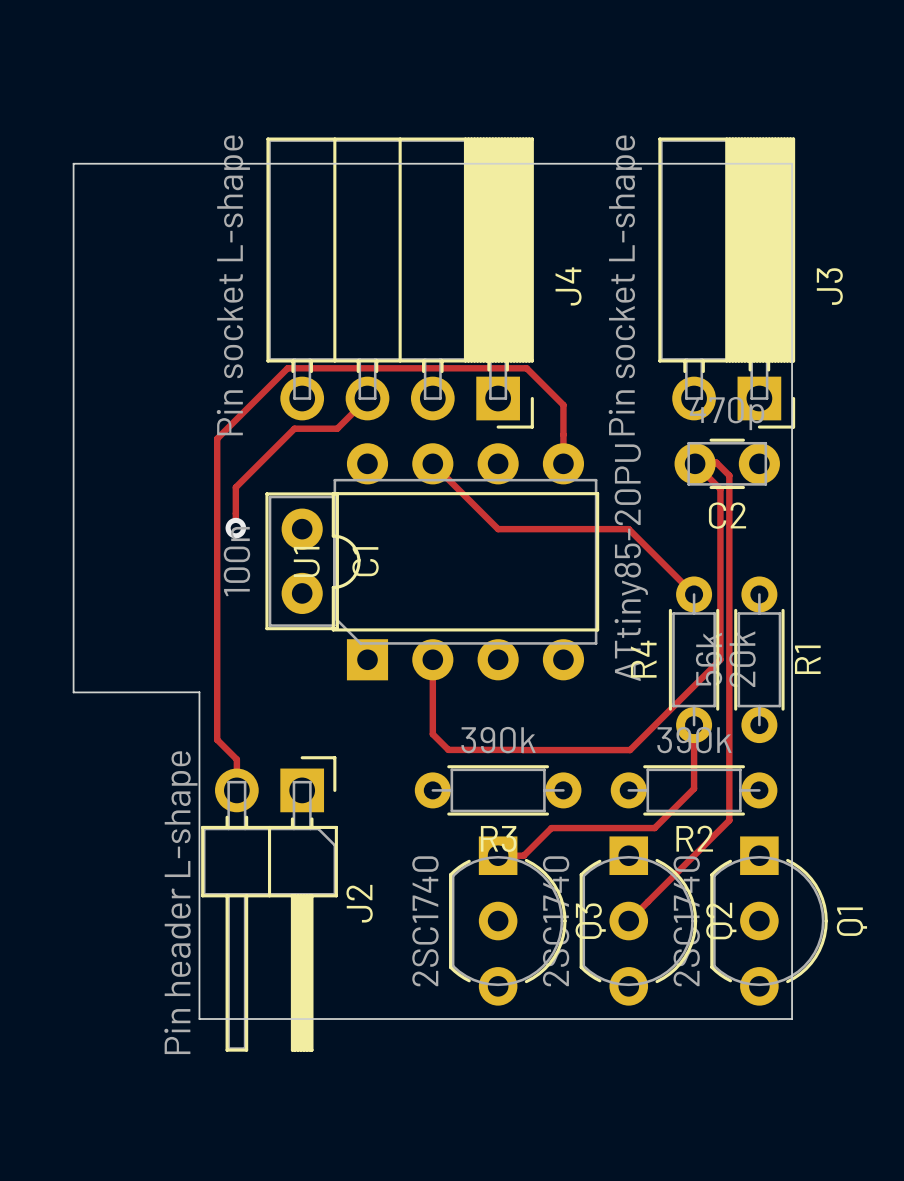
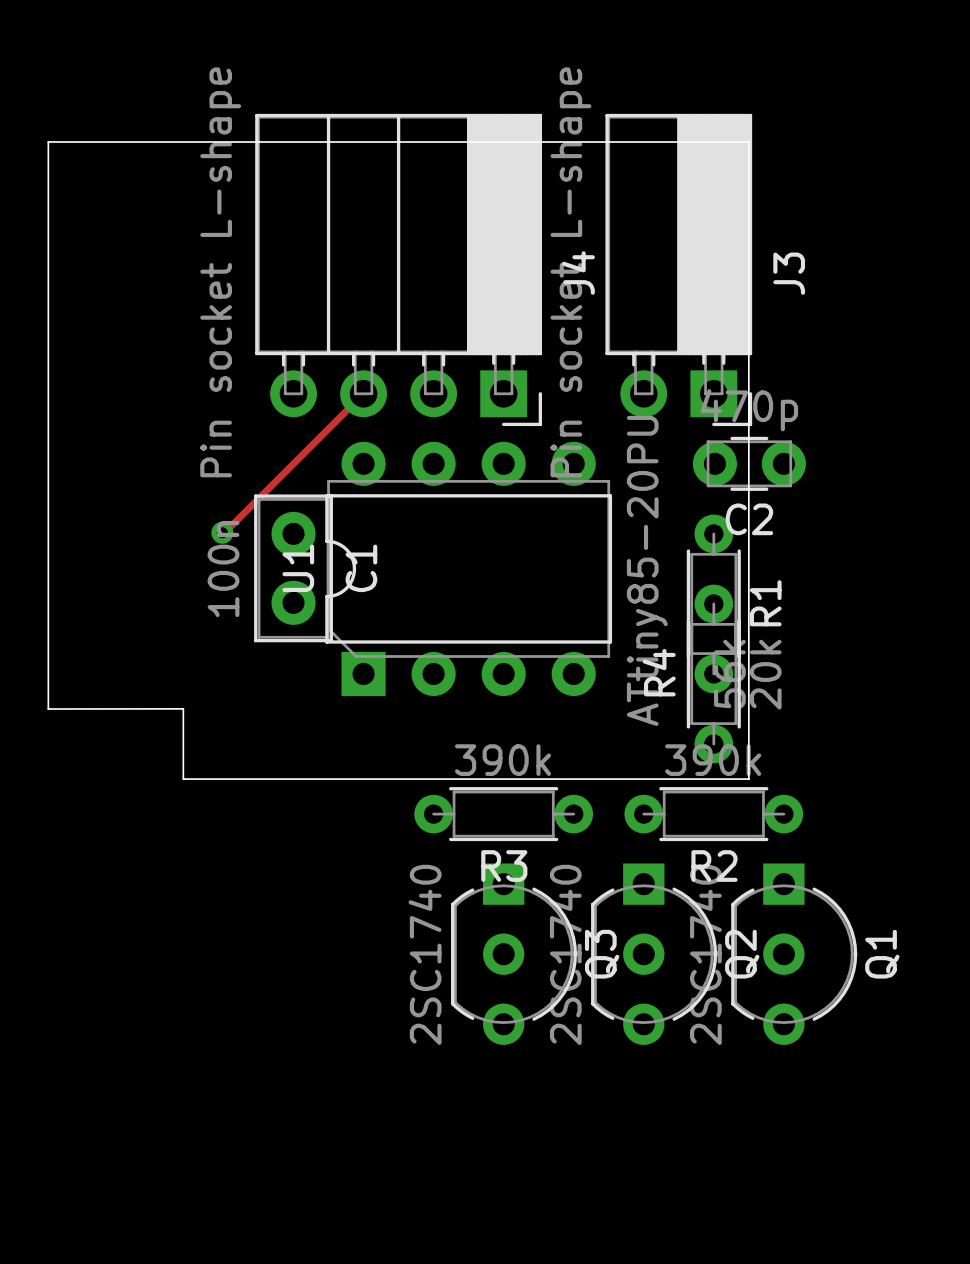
board edge: (726, 163) (792, 163) (792, 1019) (199, 1019) (199, 757) -> (748, 142) (748, 779) (183, 779)
J3 position: (726, 283) -> (678, 269)
track: (337, 428) (294, 428) (235, 487) (235, 528) -> (331, 426) (224, 533)
track: (432, 463) (498, 529) (628, 529) (694, 594) -> none
track: (563, 463) (563, 405) (526, 368) (287, 368) (217, 438) (217, 739) (236, 759) (236, 790) -> none
track: (694, 463) (716, 462) (729, 475) (729, 820) (628, 921) -> none
track: (694, 464) (720, 489) (720, 659) (630, 750) (448, 749) (432, 734) (432, 659) -> none
R1 position: (759, 659) -> (713, 603)
track: (694, 725) (694, 788) (654, 828) (551, 828) (523, 855) (498, 855) -> none
J2: Pin header L-shape (269, 903) -> none

